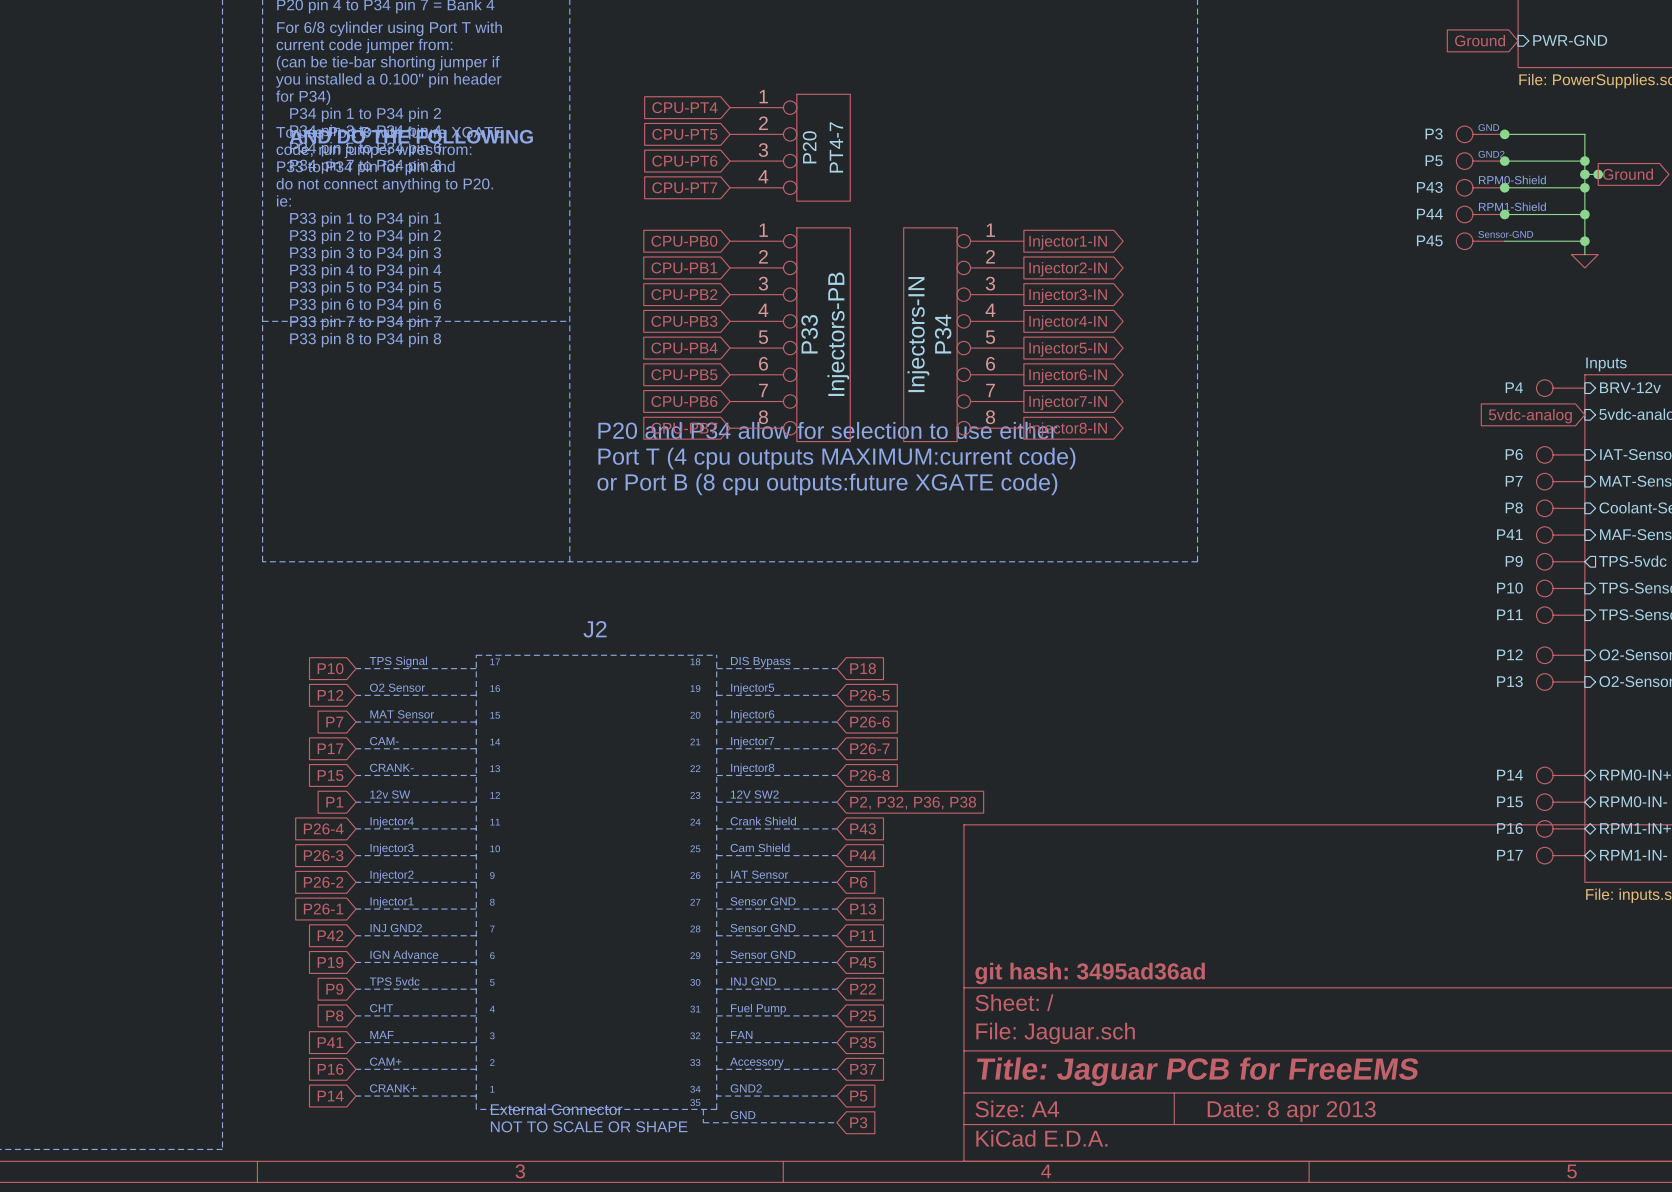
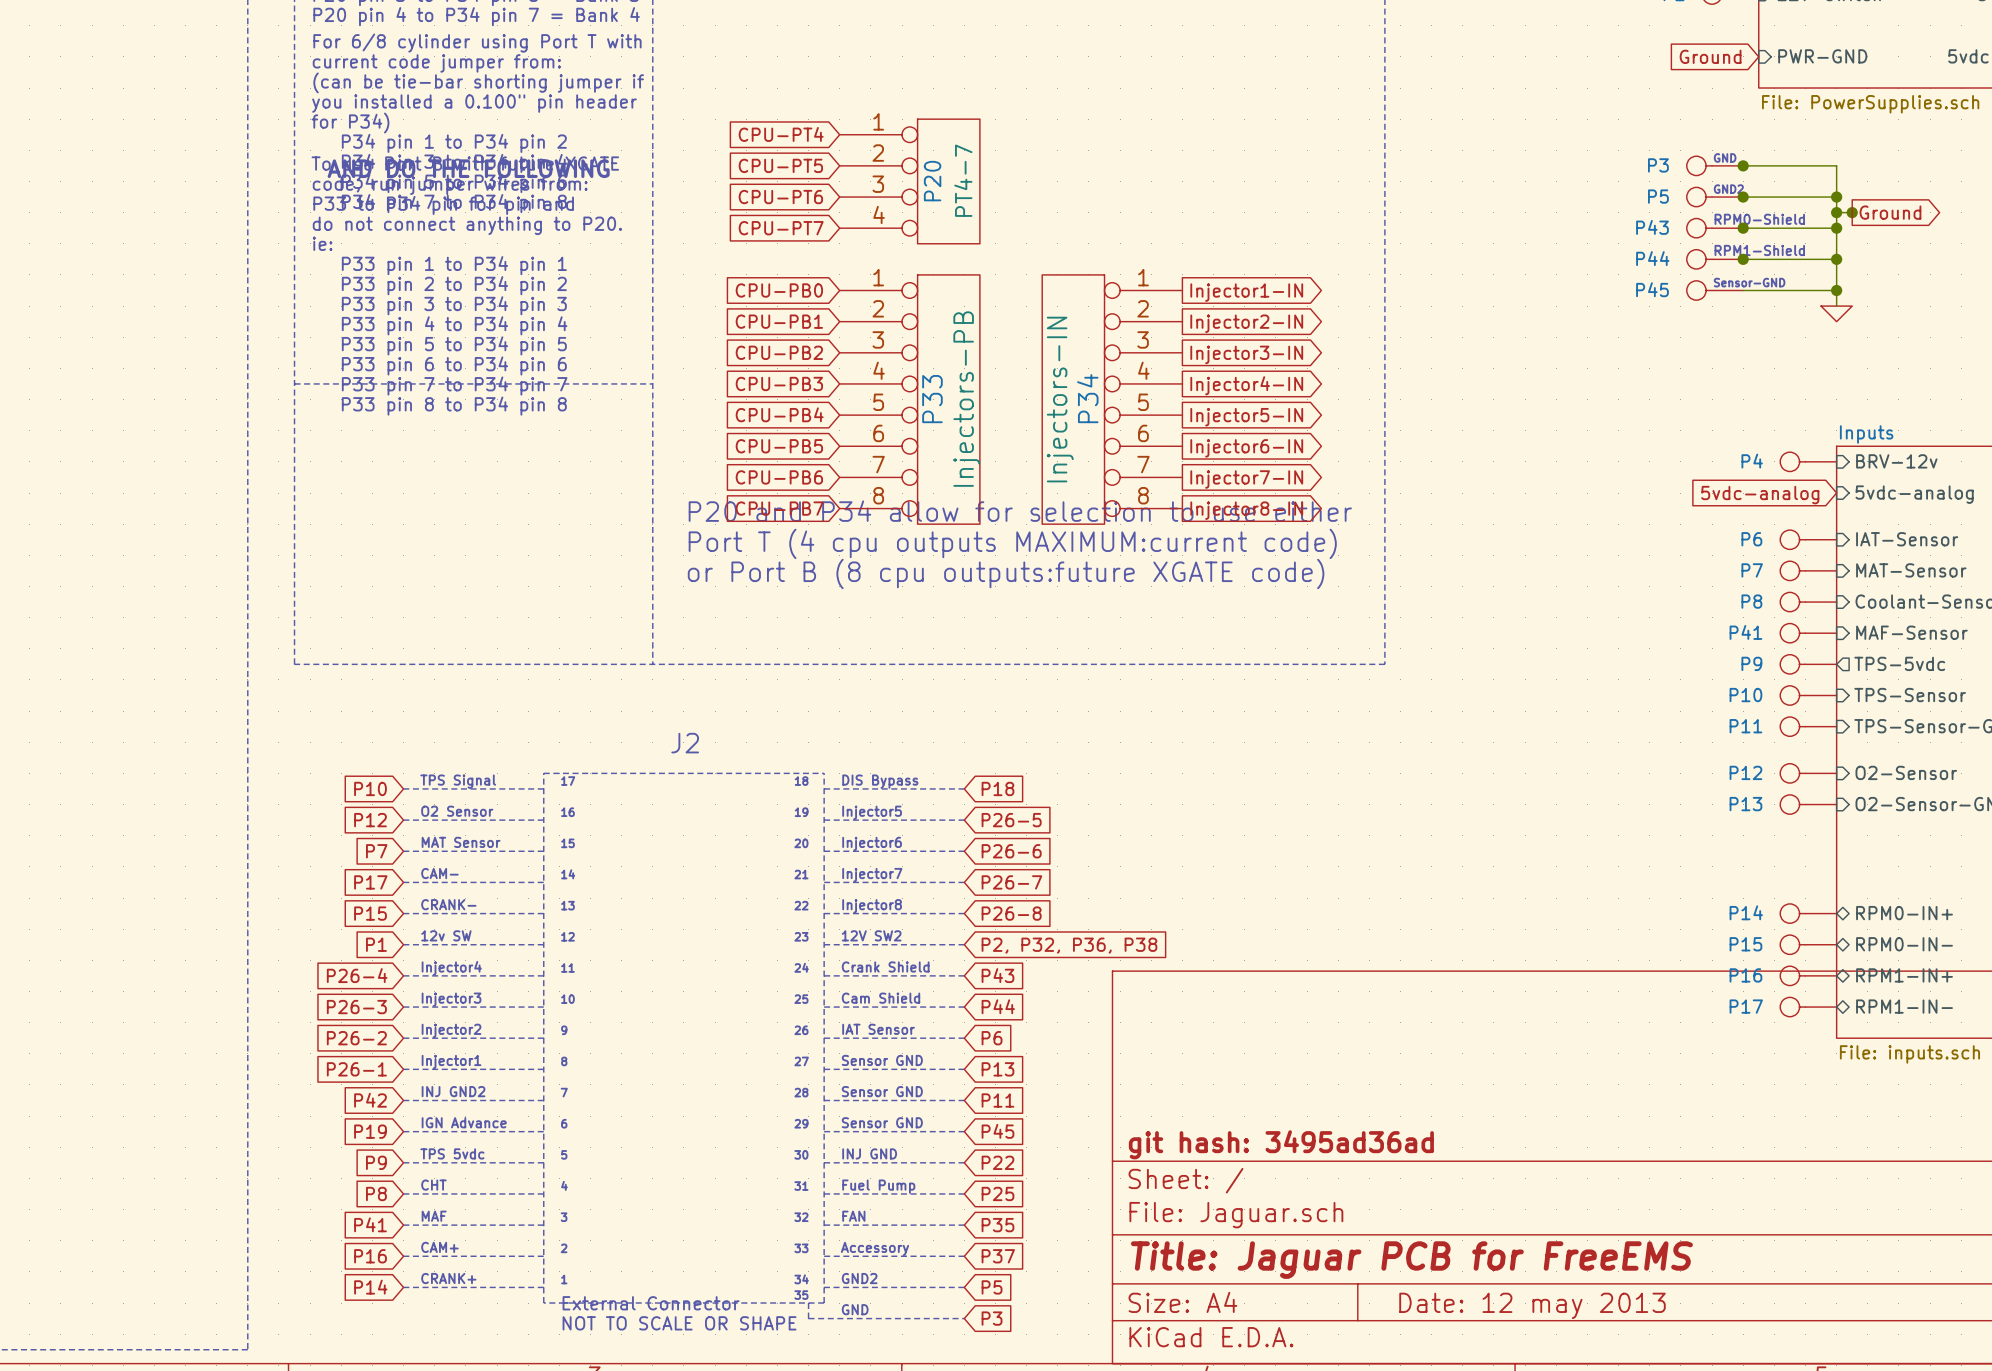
title block: Date: 8 apr 2013 (1291, 1111) -> Date: 12 may 2013 (1532, 1305)

